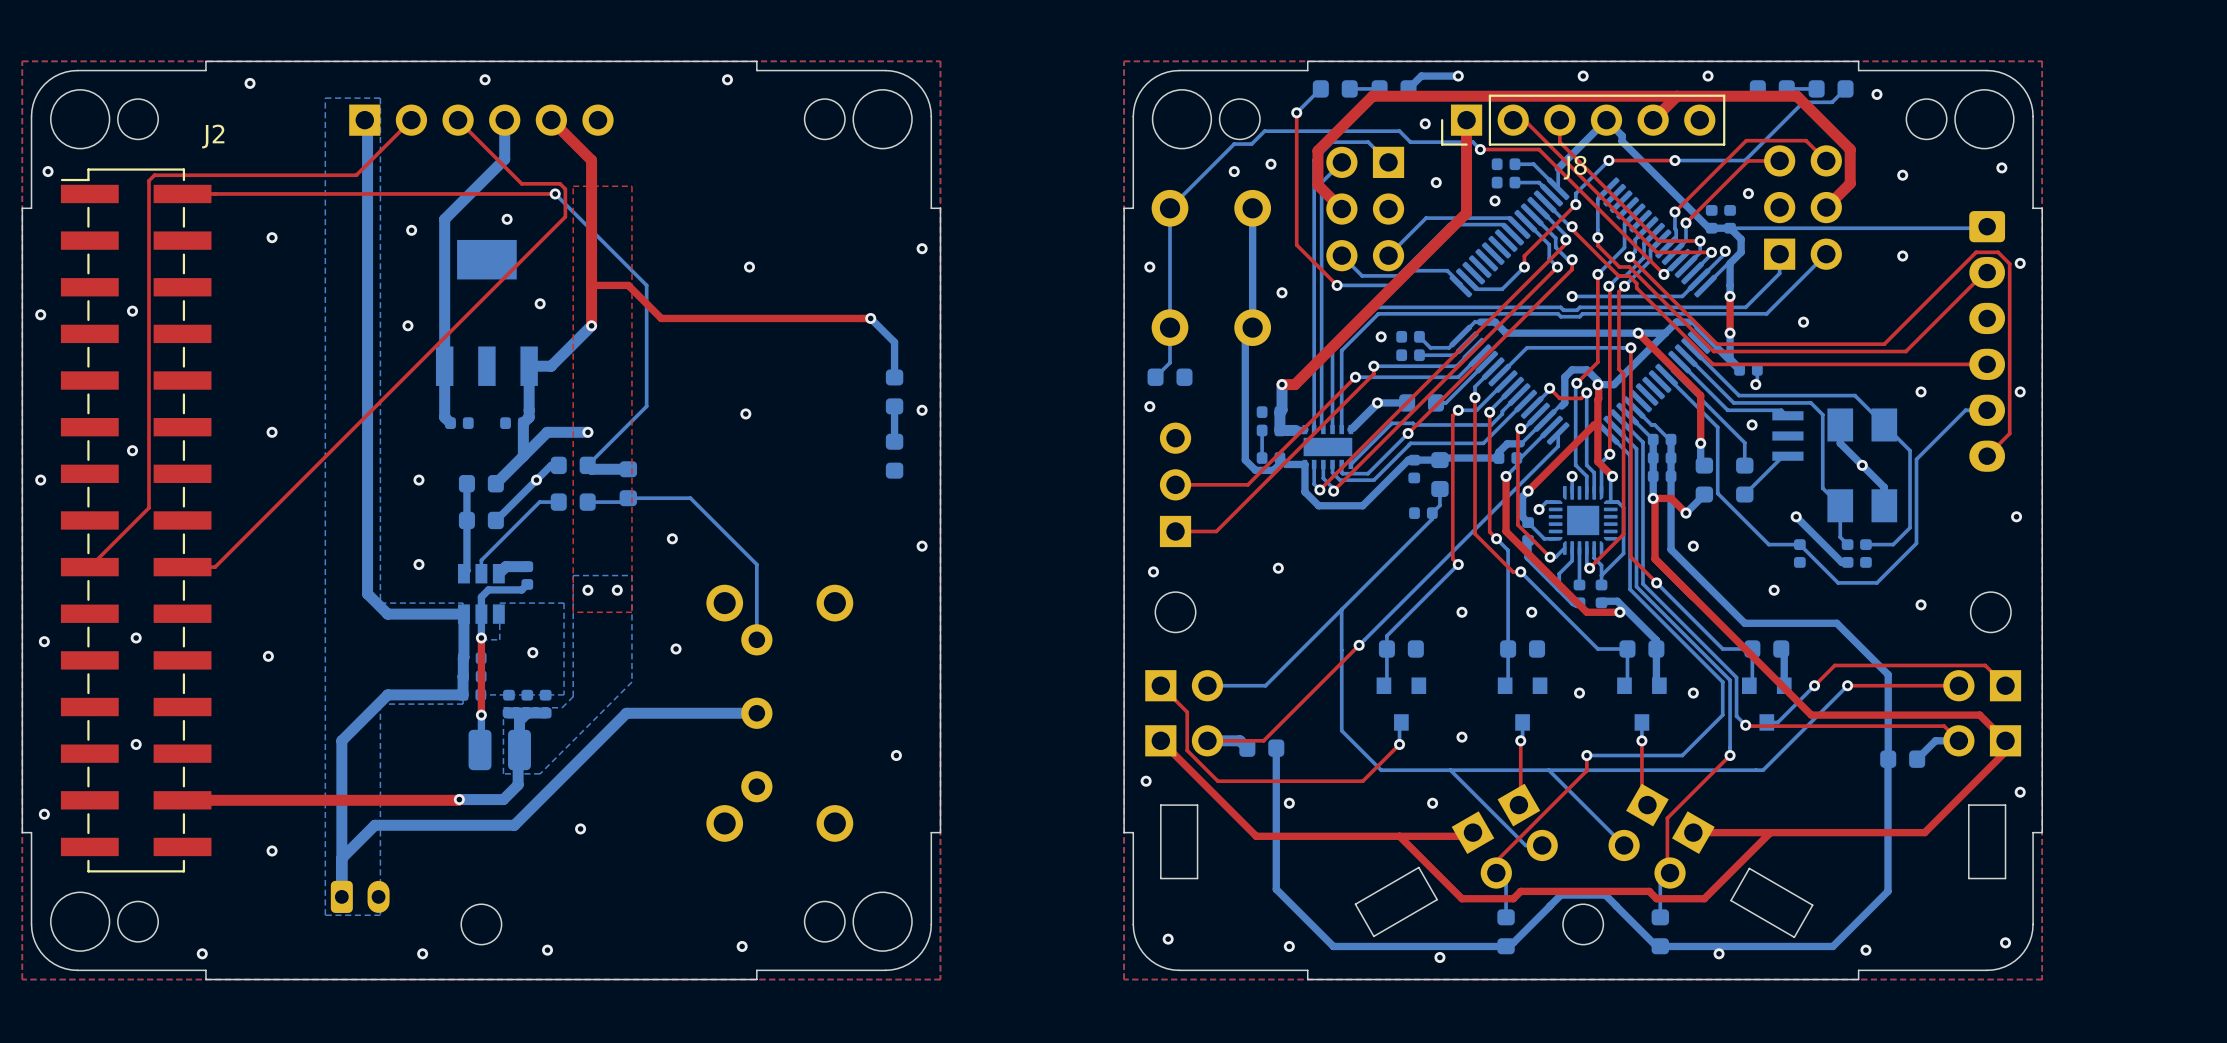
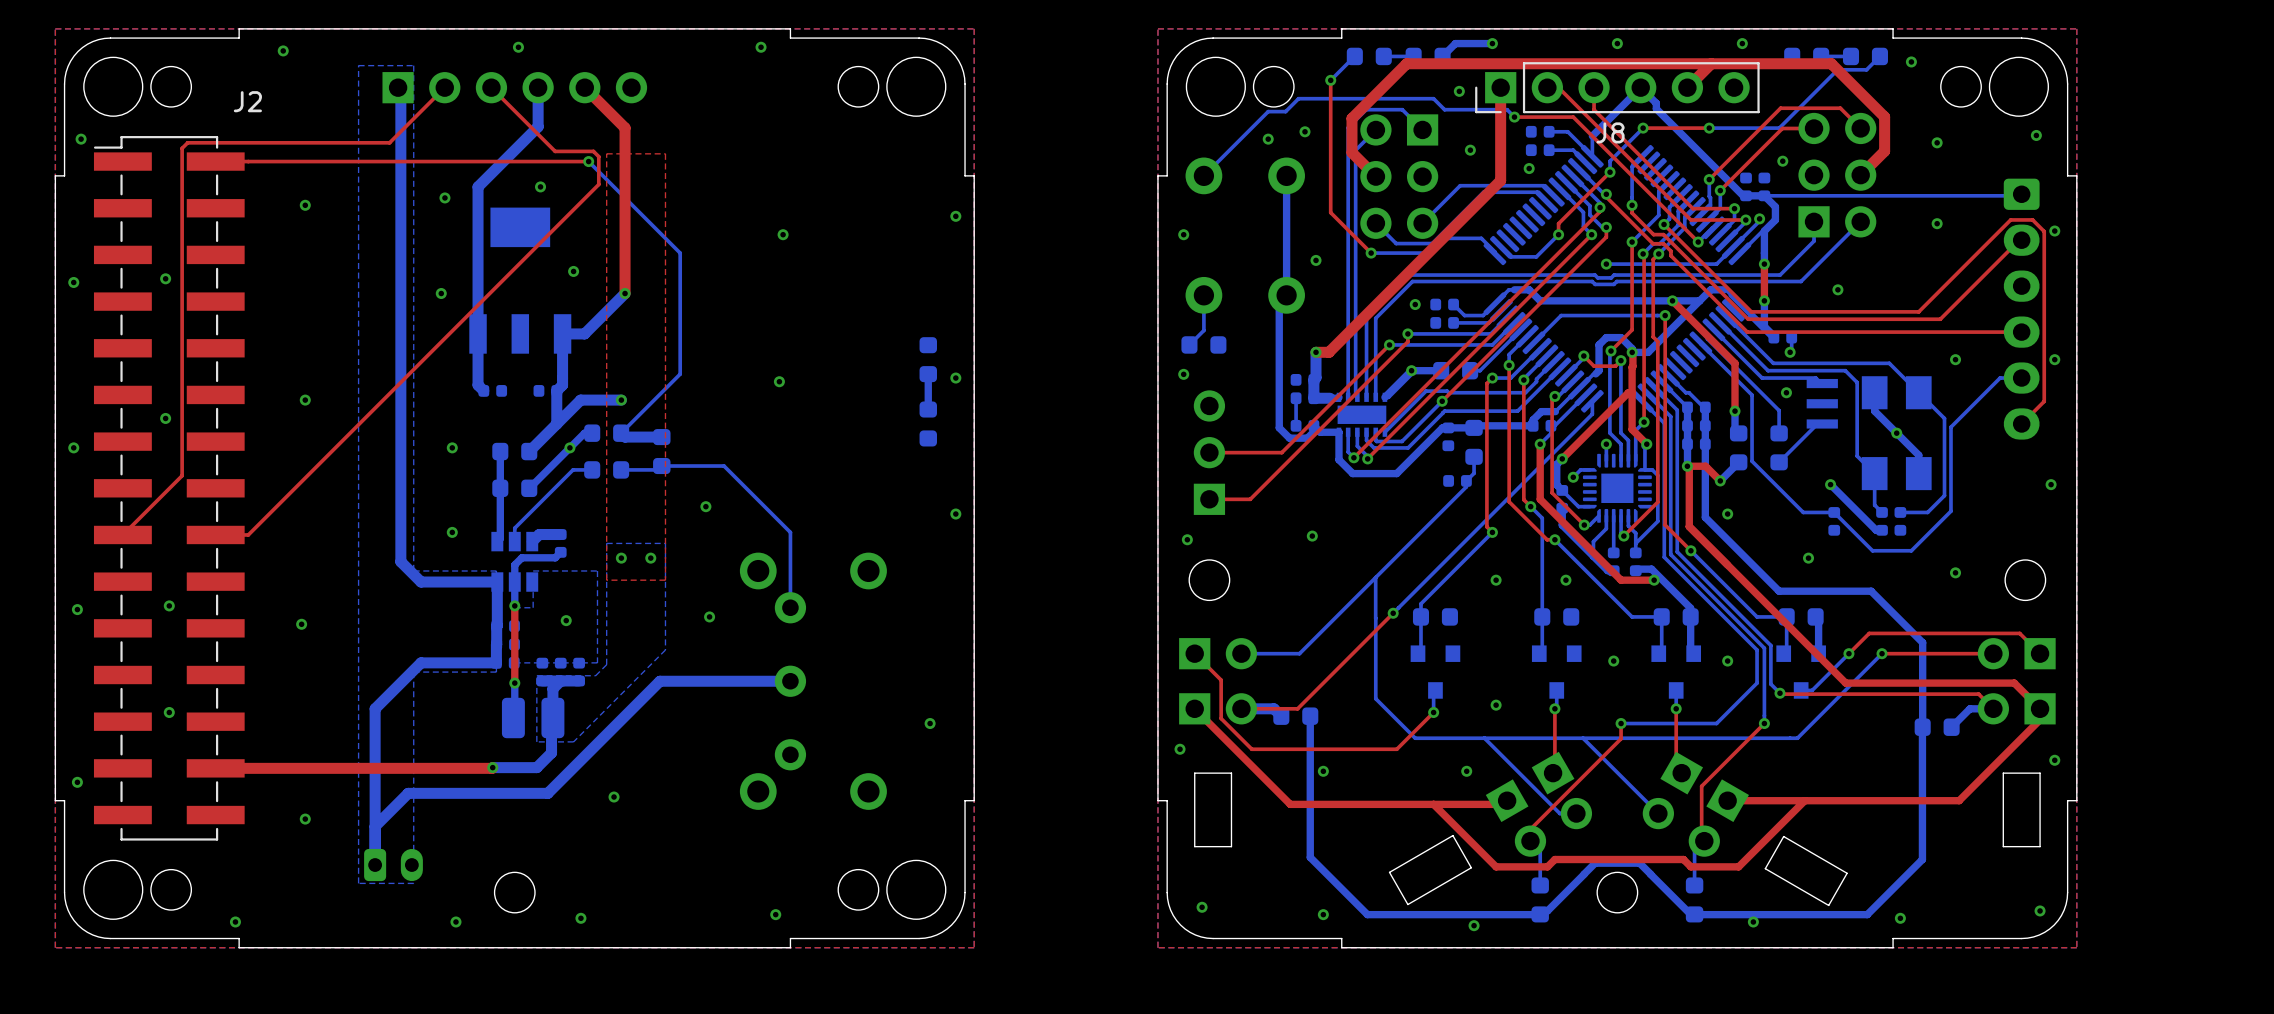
bottom track: (1170, 208) (1170, 327) -> none
top track: (591, 285) (628, 285) (661, 318) (870, 318) -> none
bottom track: (870, 318) (894, 342) (894, 377) -> none
via: (870, 318) -> none

